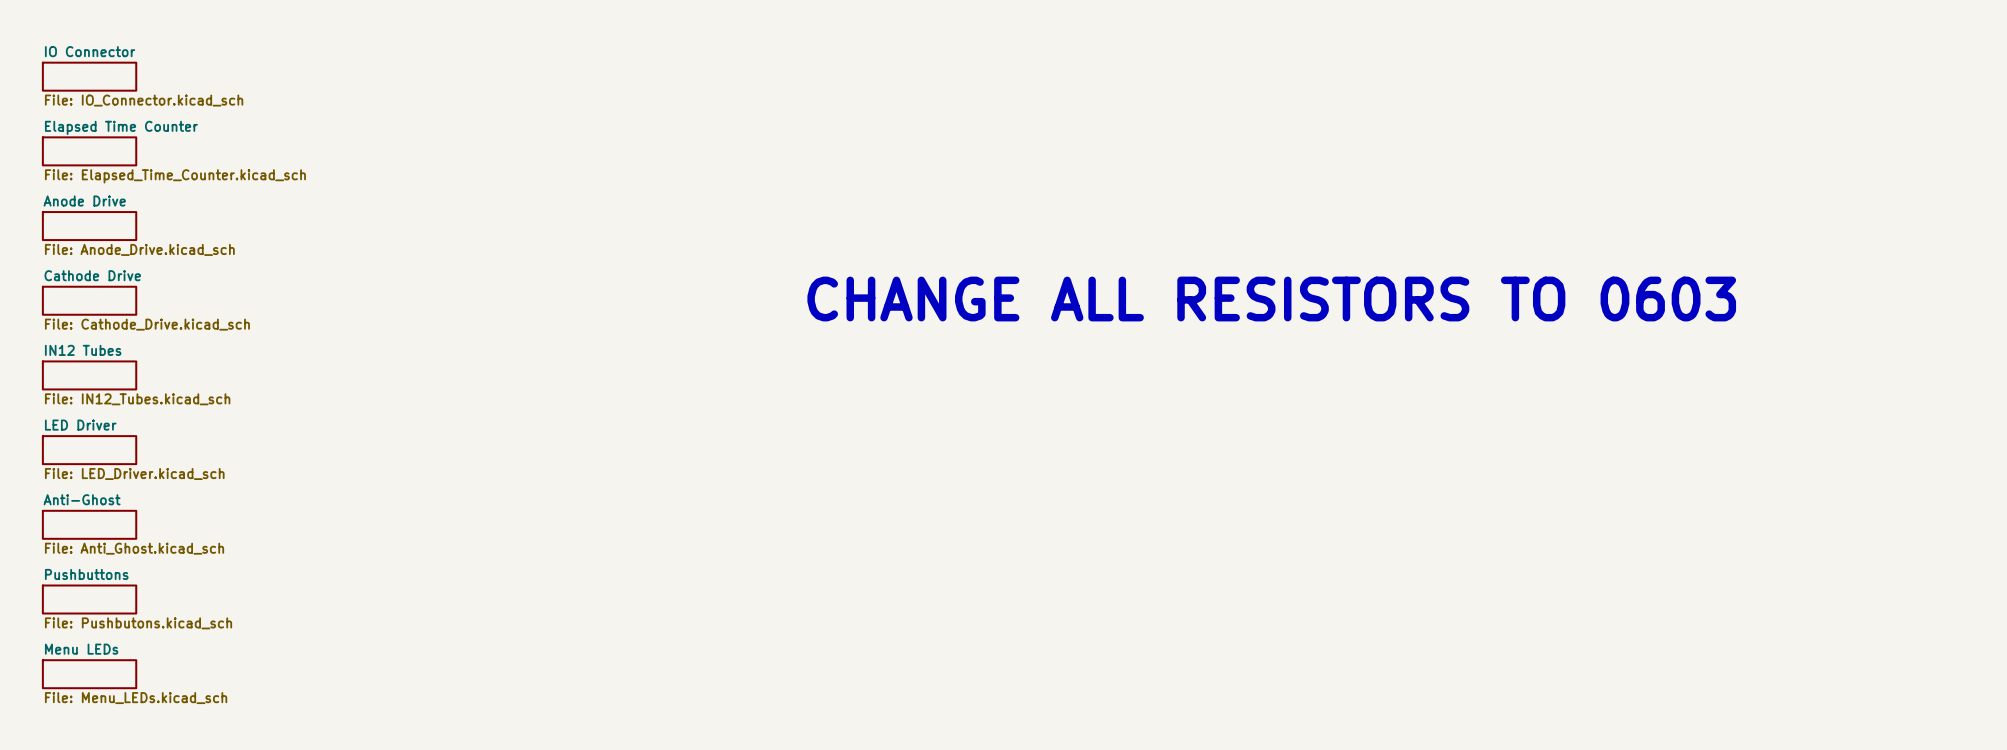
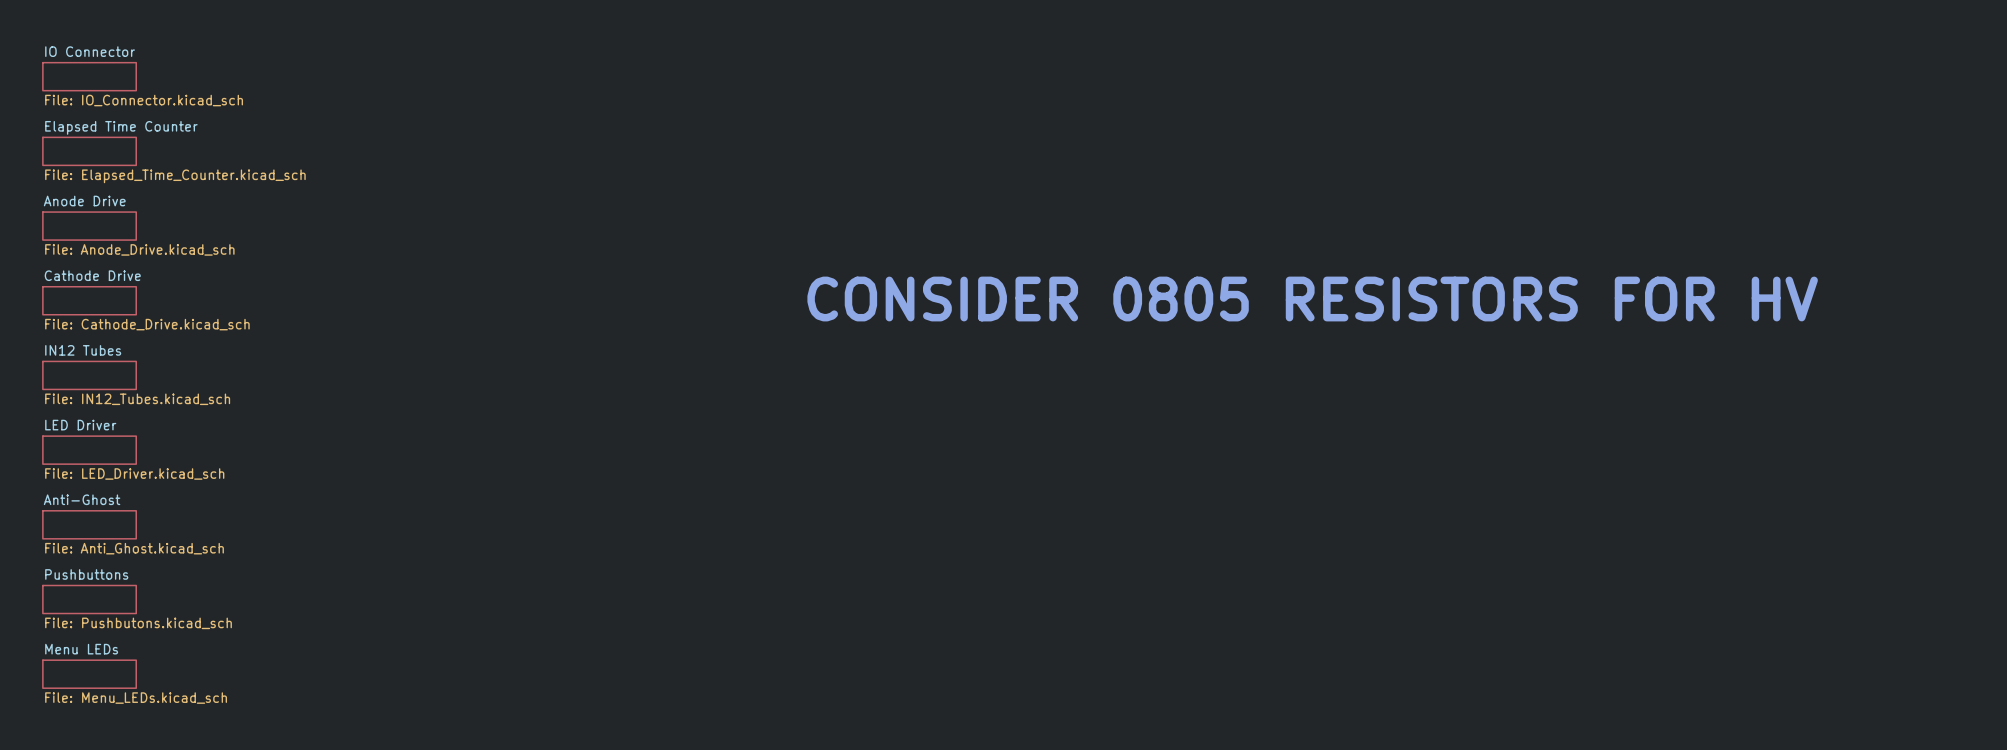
text: CHANGE ALL RESISTORS TO 0603 (1271, 299) -> CONSIDER 0805 RESISTORS FOR HV (1312, 299)

